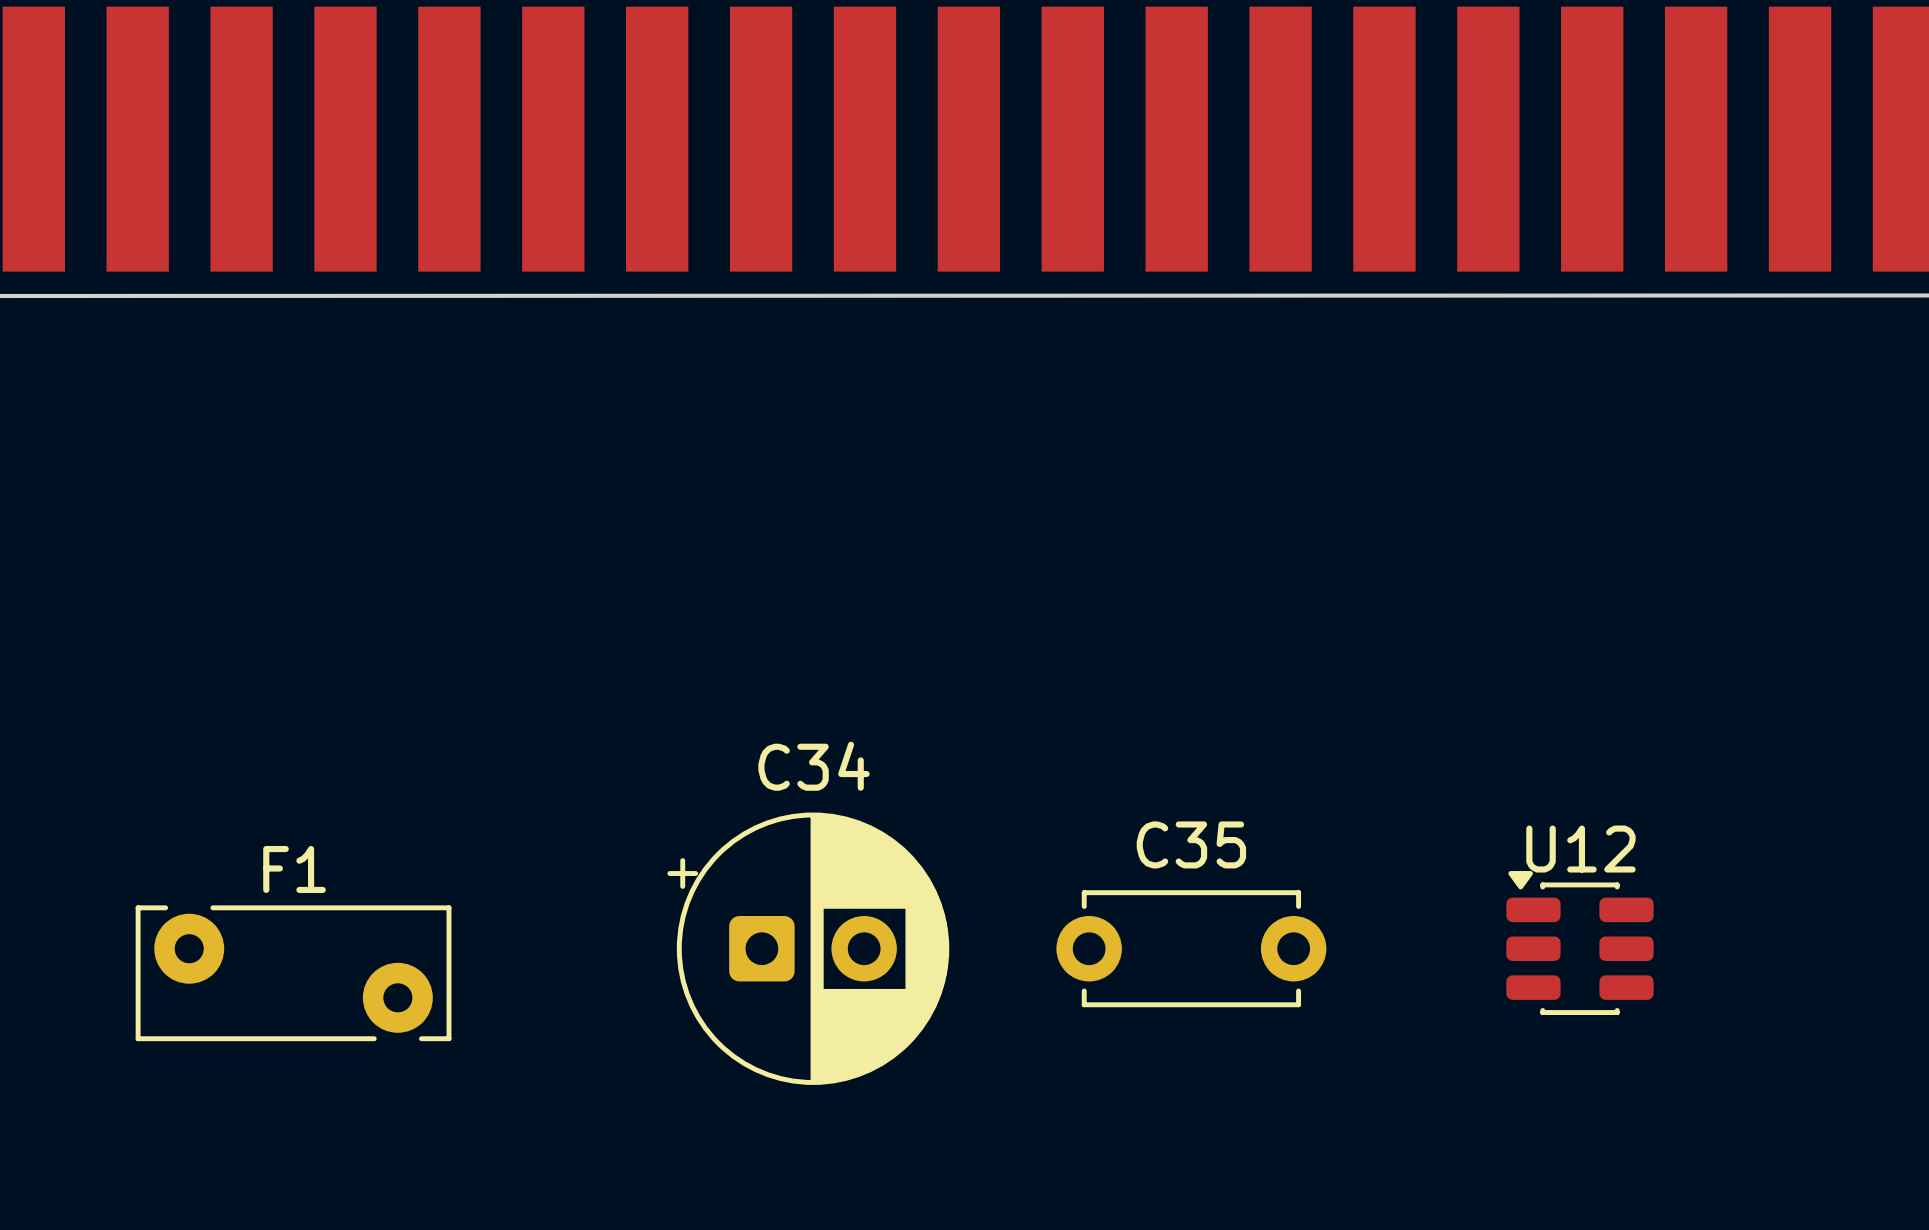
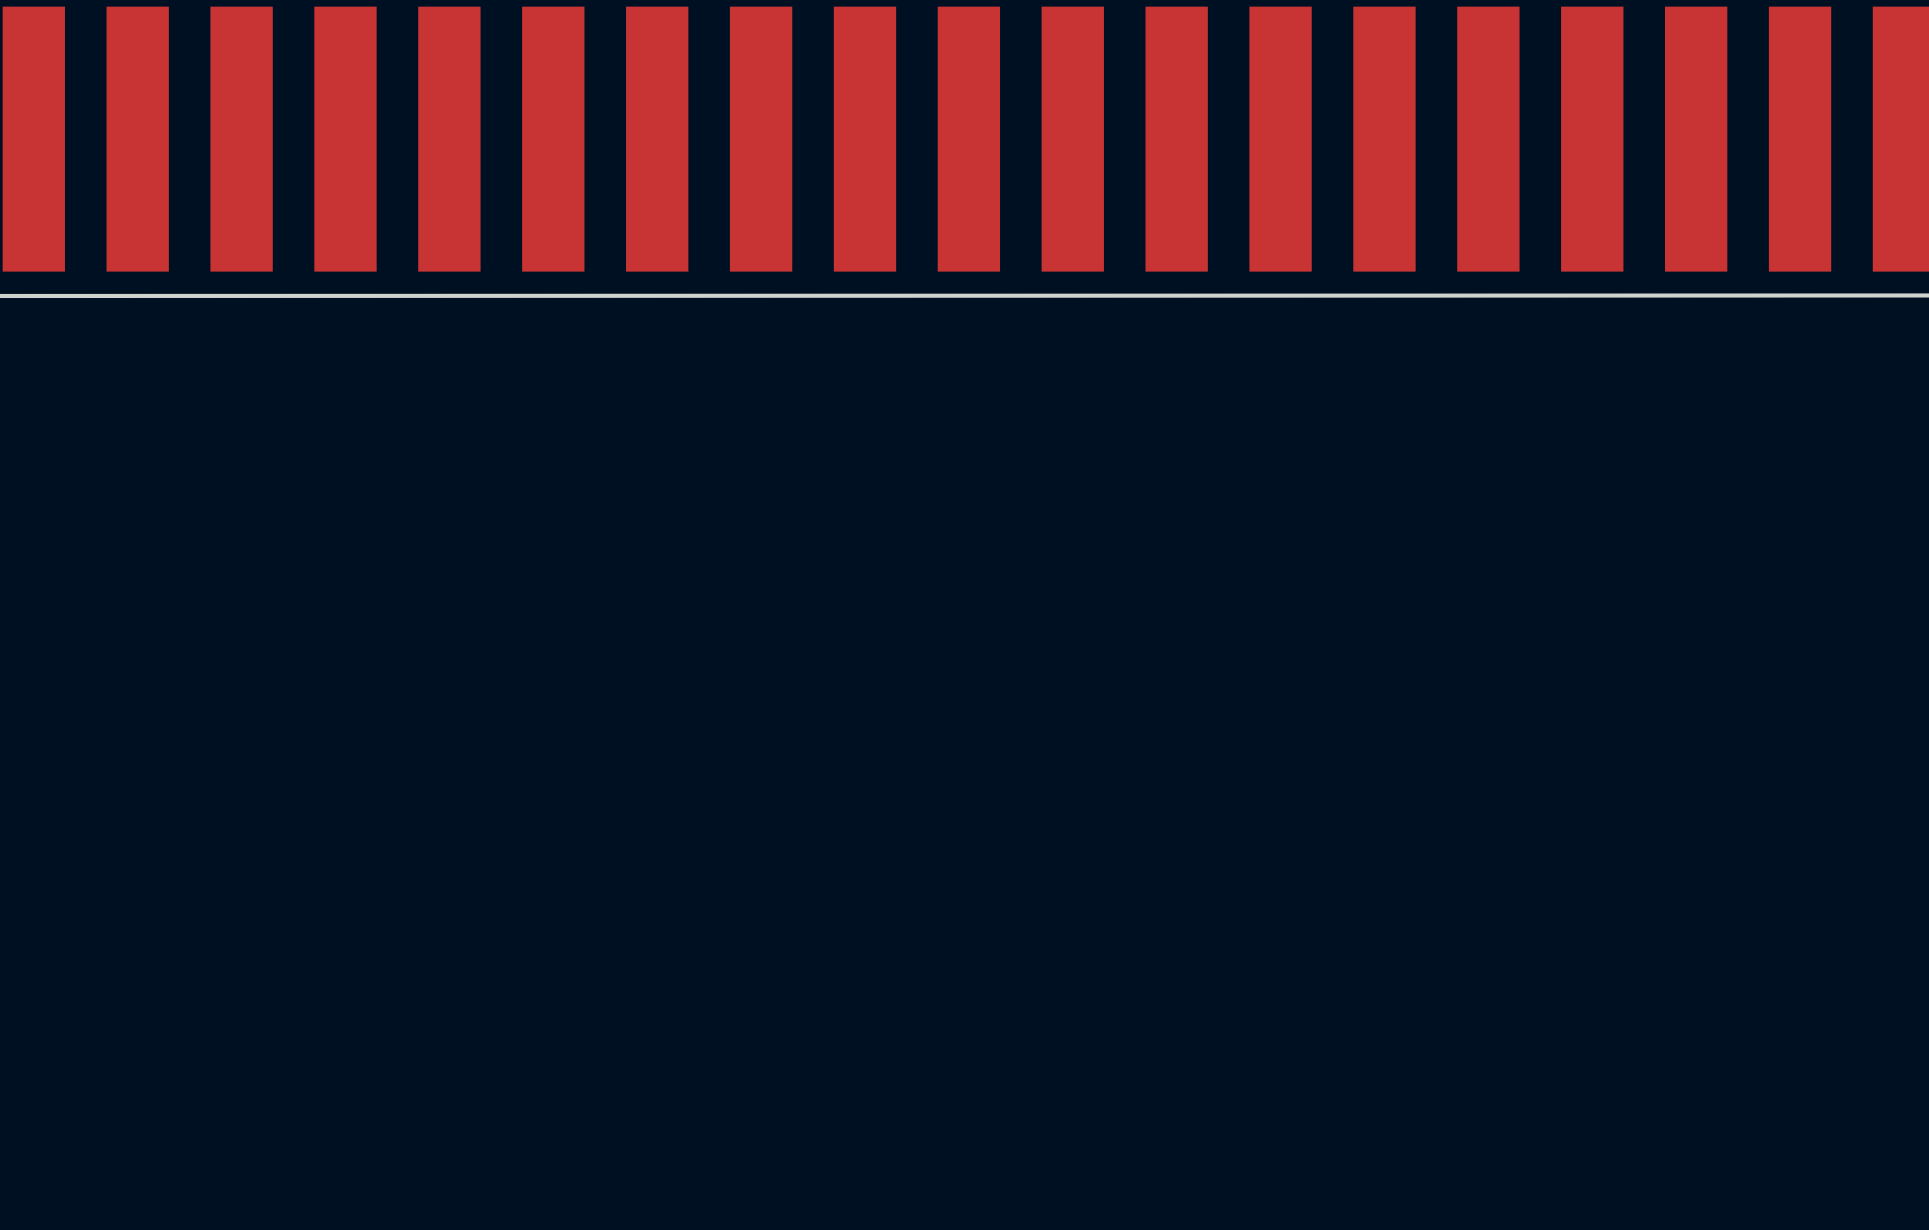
U12: (1579, 943) -> none
C34: (808, 948) -> none
C35: (1191, 948) -> none
F1: (293, 973) -> none

